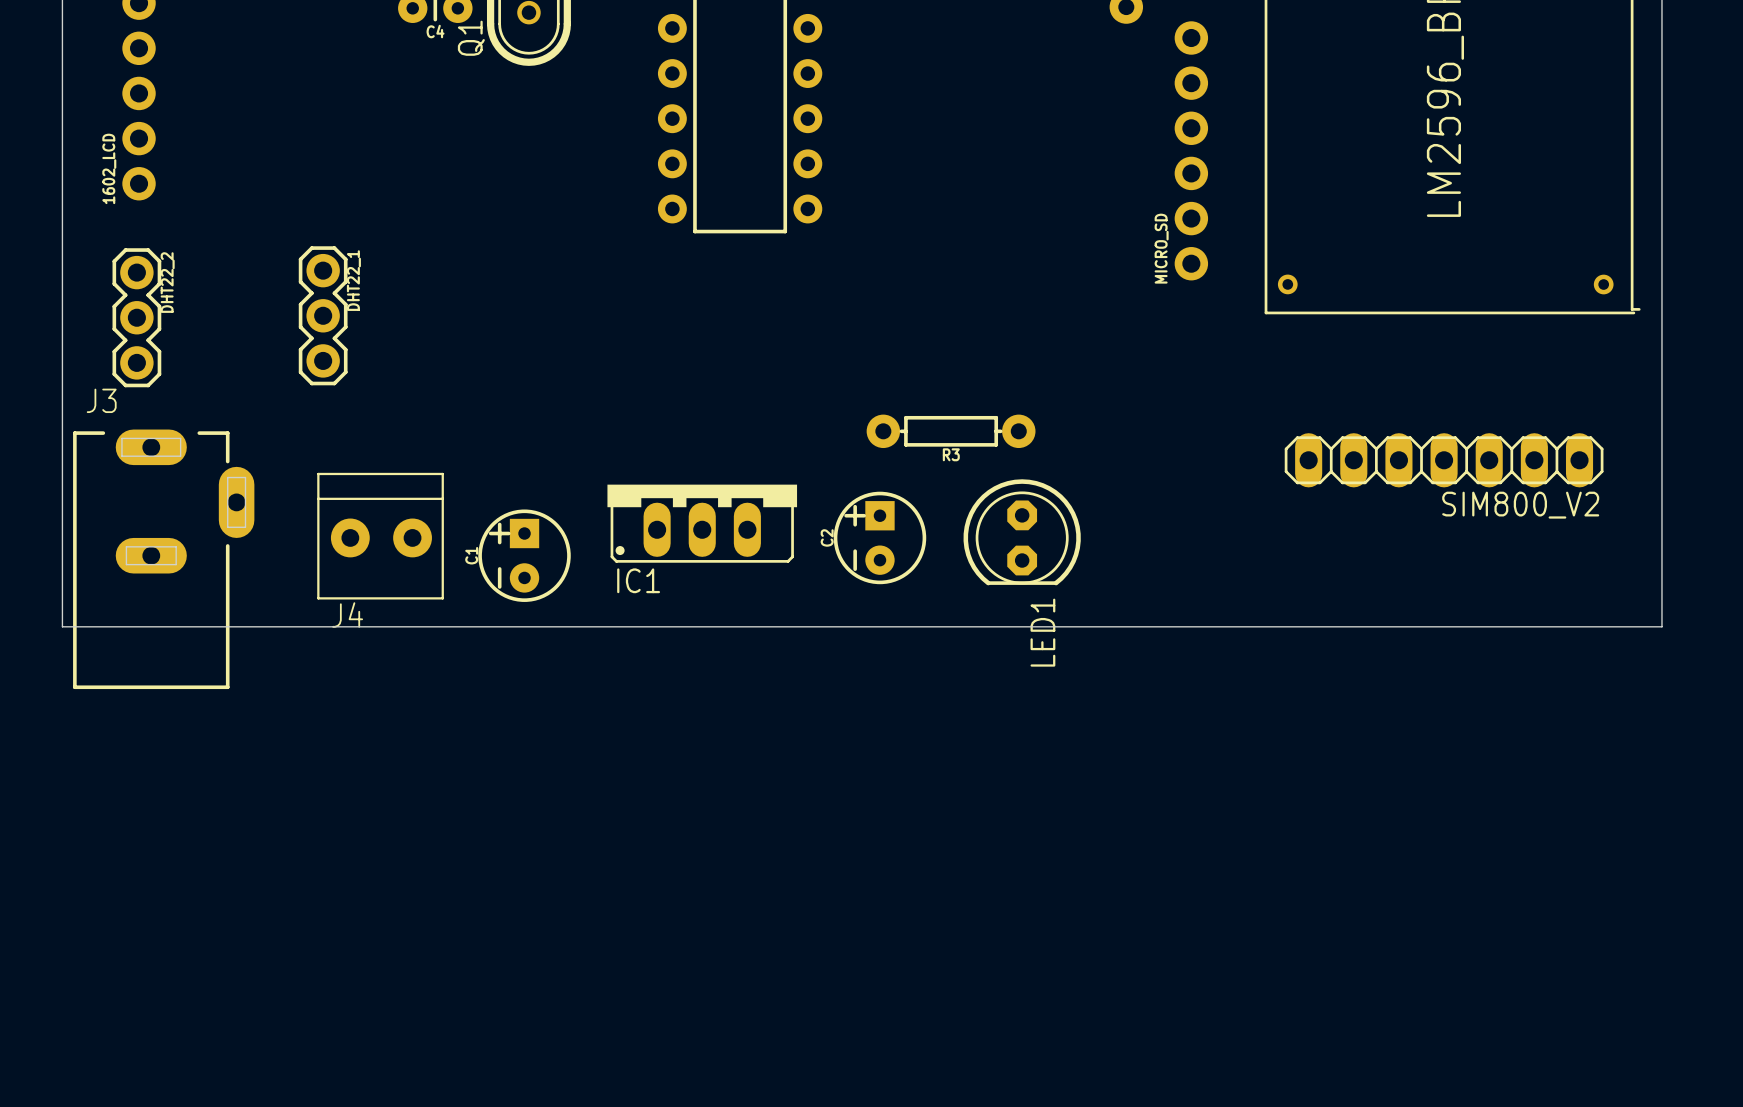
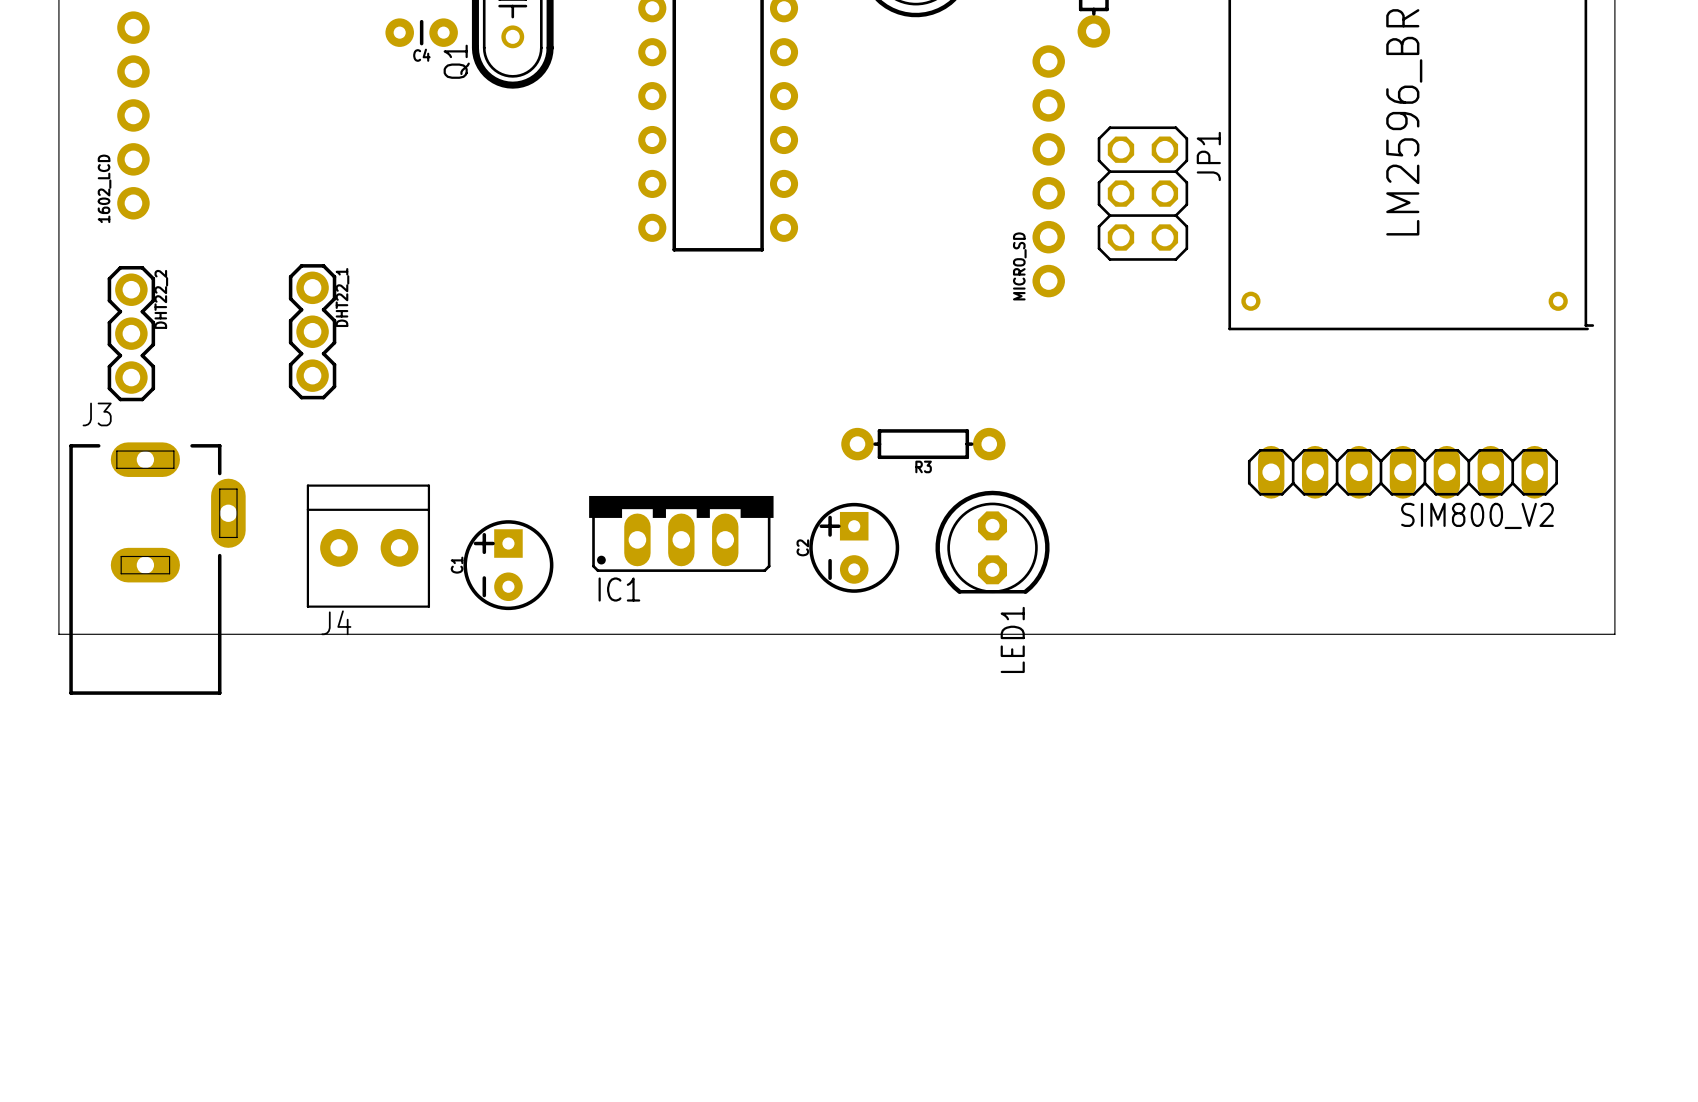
MICRO_SD position: (1191, 150) -> (1048, 171)
JP1: none -> (1142, 193)

